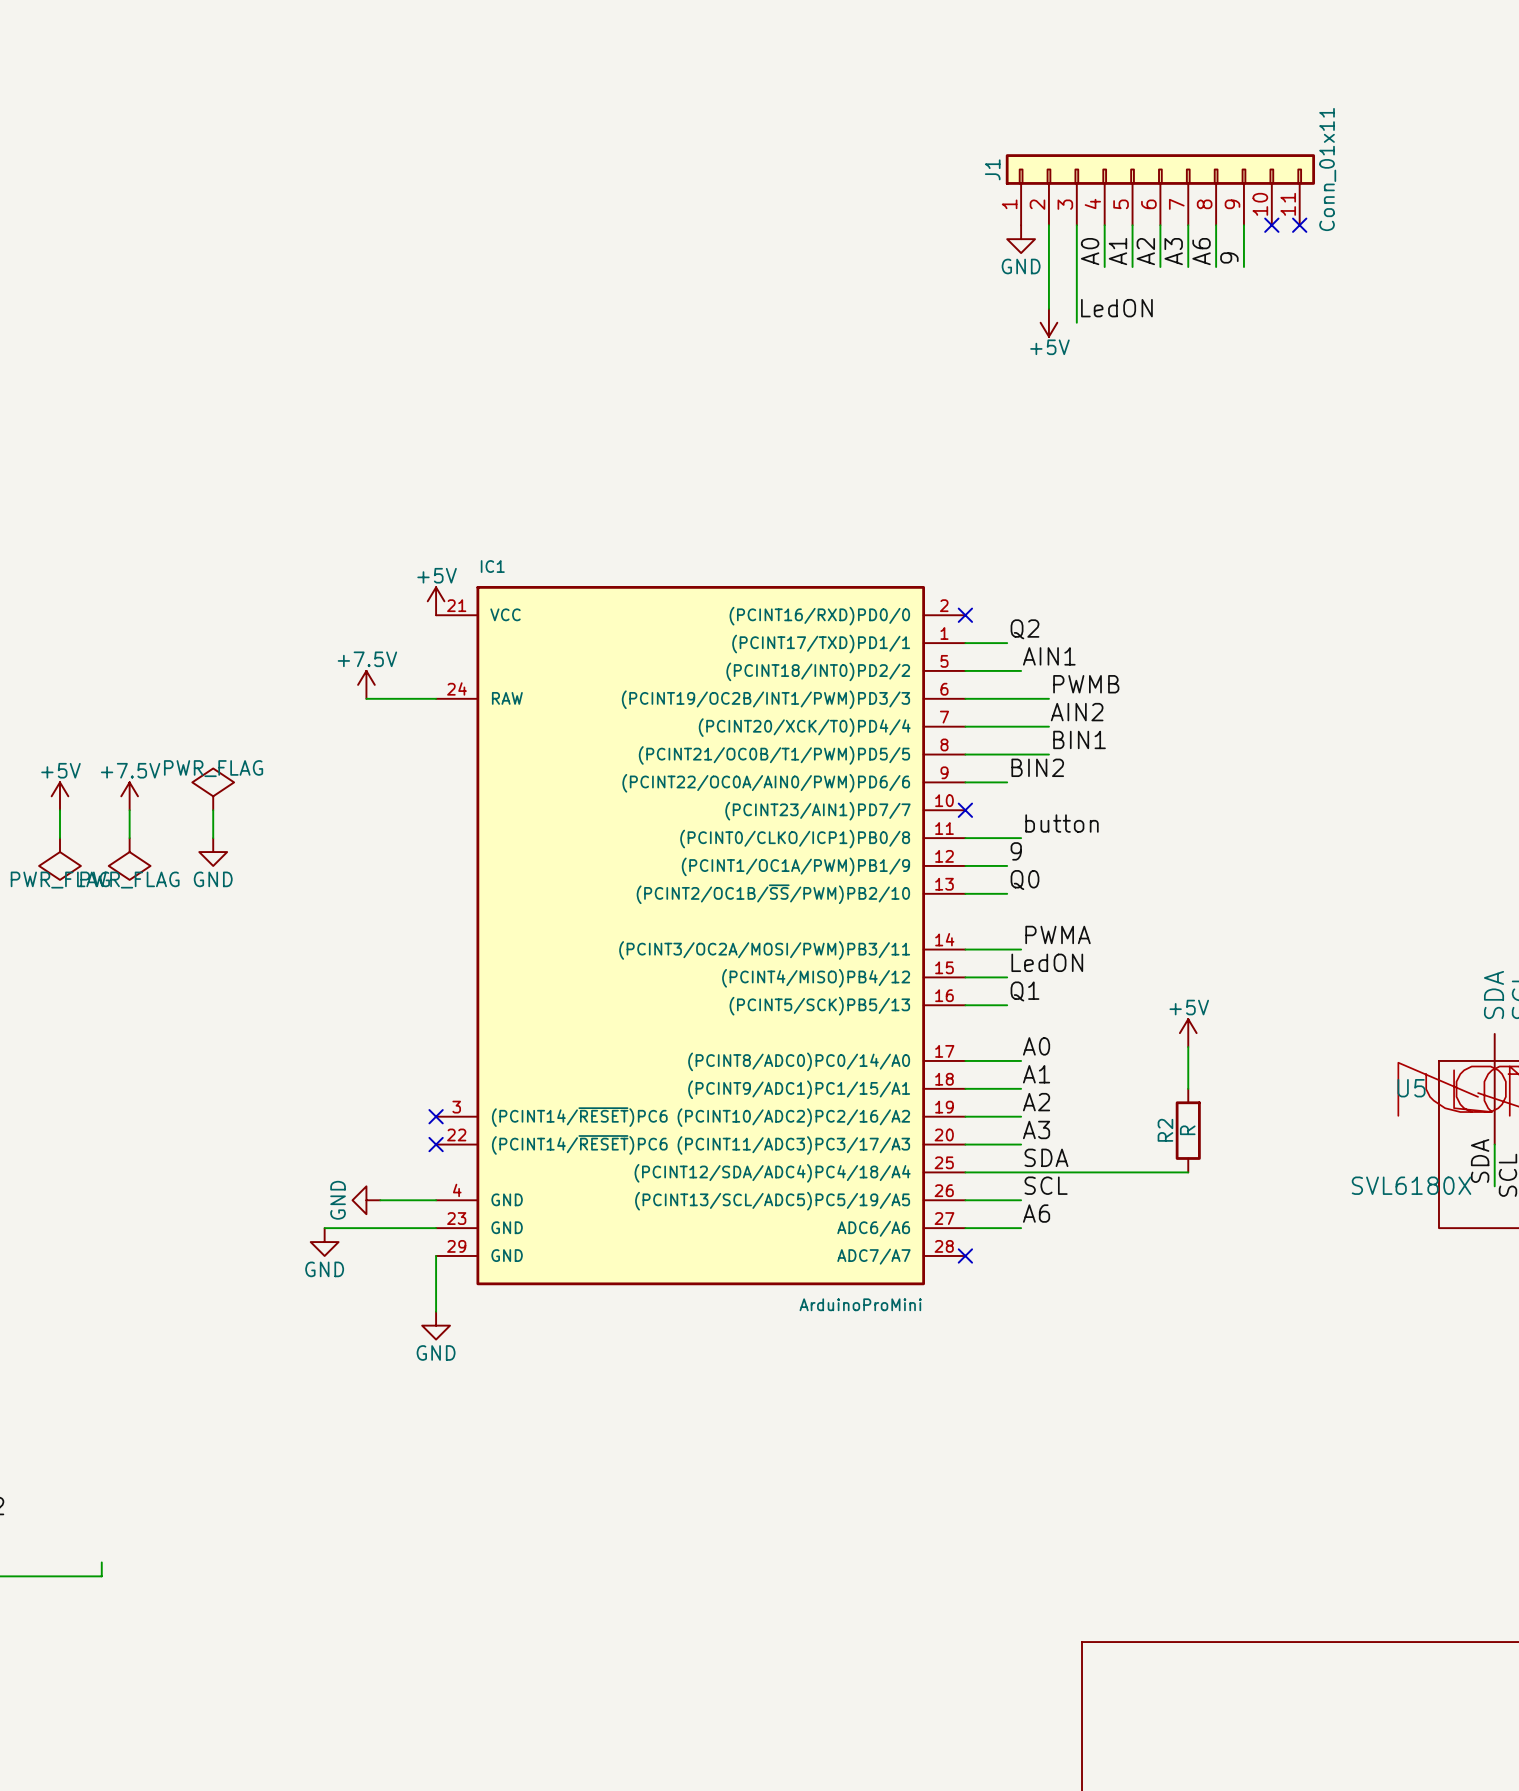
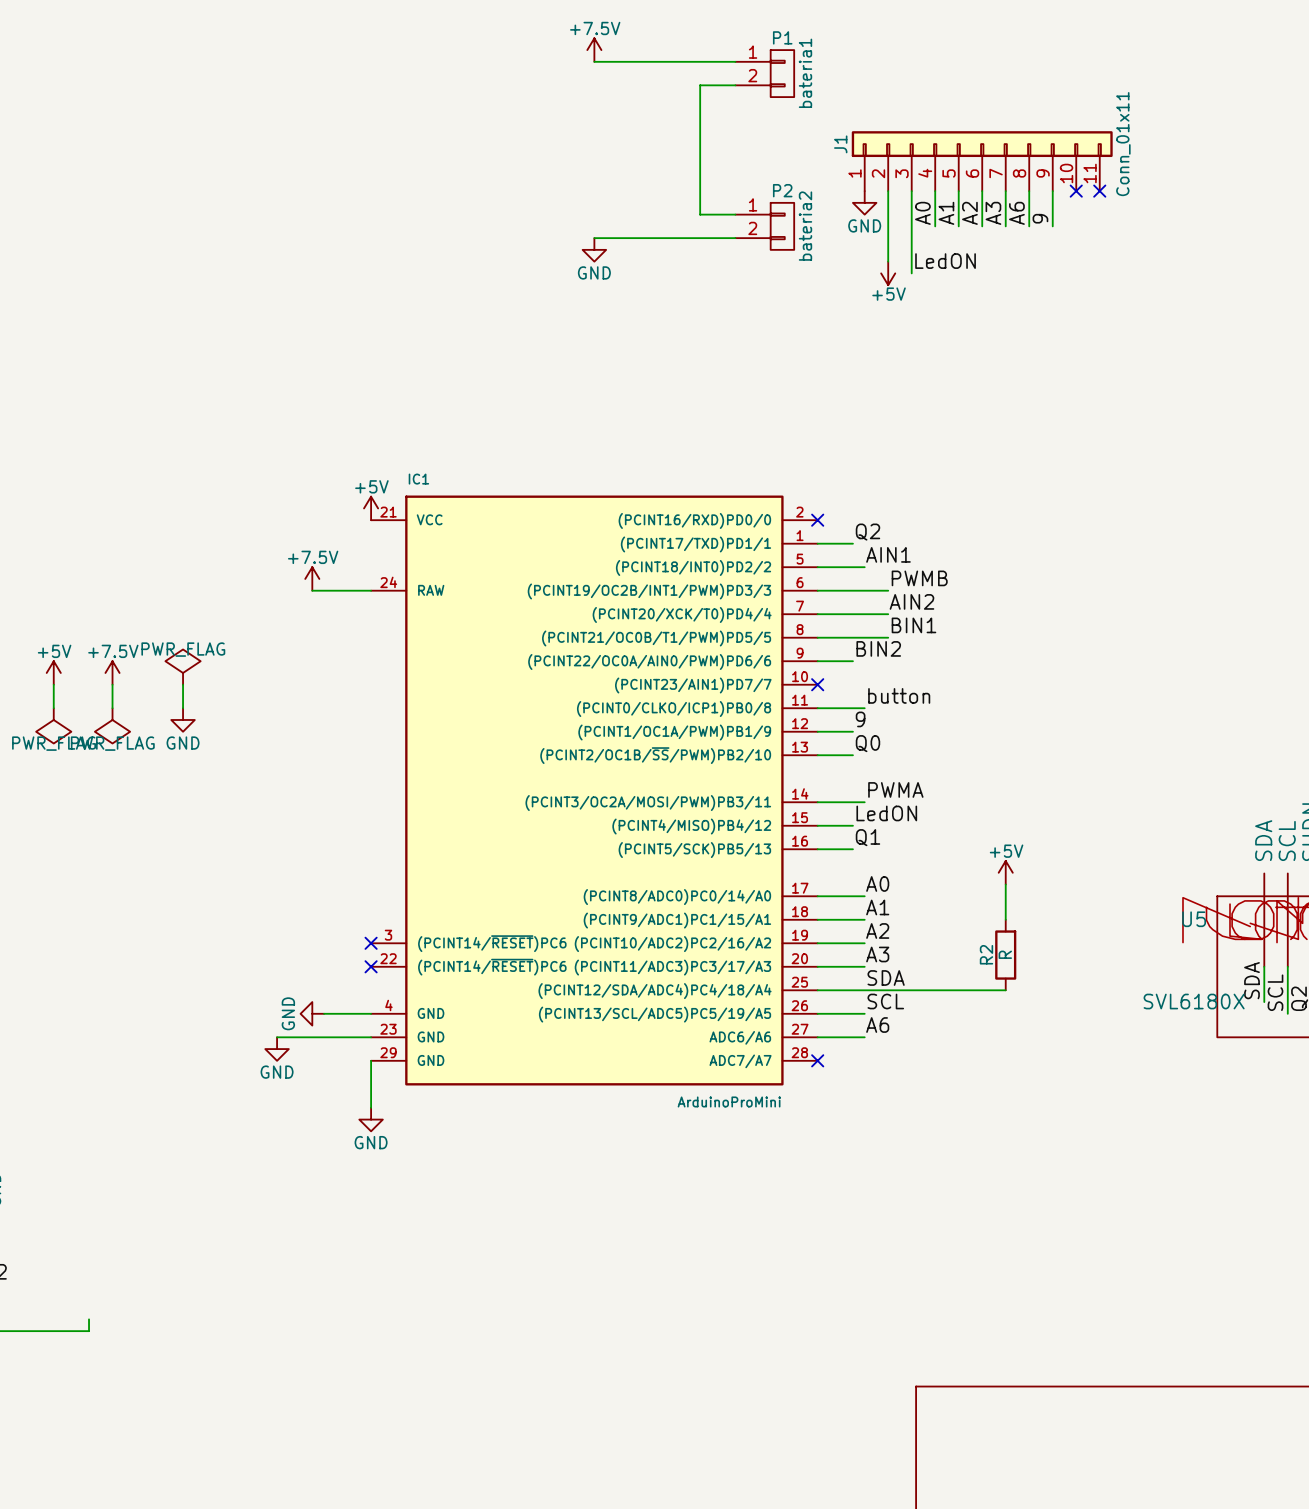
power symbol: none -> +7.5V (594, 50)
wire: none -> (594, 61) (735, 61)
P1: none -> bateria1 (764, 73)
wire: none -> (735, 85) (700, 85) (700, 214) (735, 214)
P2: none -> bateria2 (764, 226)
wire: none -> (594, 238) (735, 238)
power symbol: none -> GND (594, 249)

